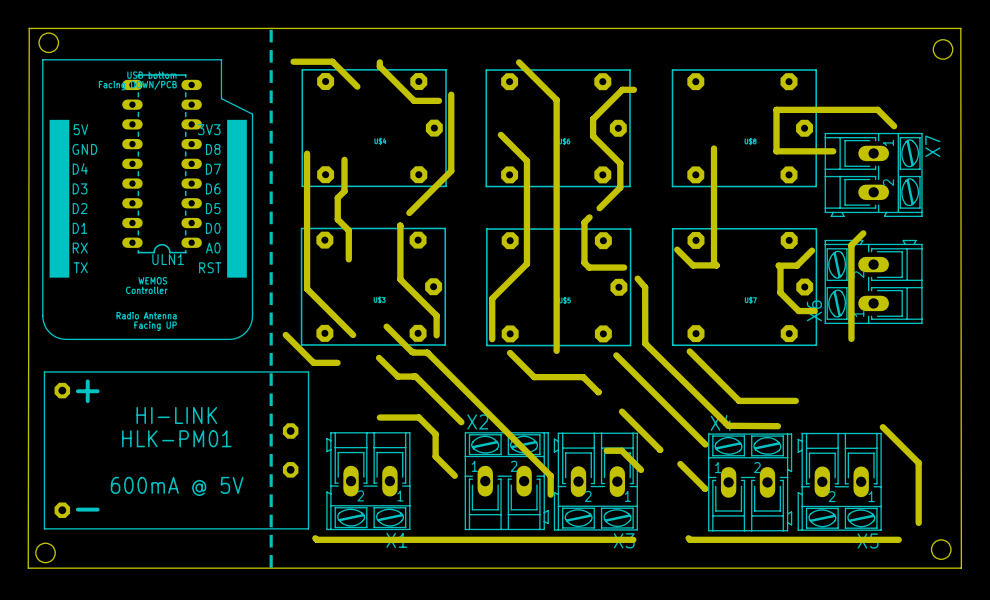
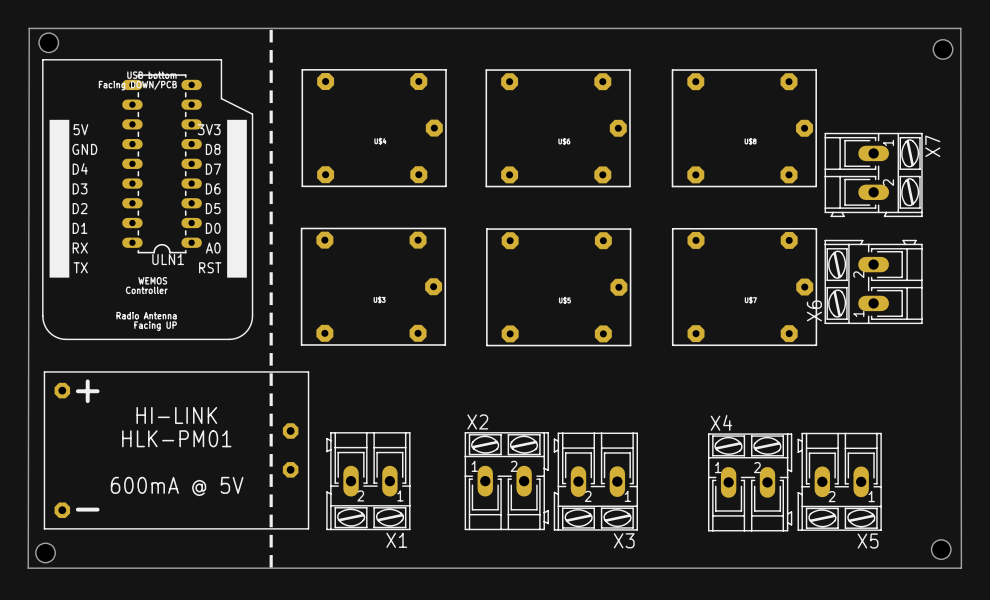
board edge: (293, 61) (332, 61) (357, 86) -> none
board edge: (379, 62) (379, 66) (414, 100) (438, 100) -> none
board edge: (519, 62) (556, 99) (556, 350) -> none
board edge: (633, 89) (622, 89) (593, 119) (593, 136) (620, 163) (620, 187) (599, 208) -> none
board edge: (451, 94) (451, 171) (409, 212) -> none
board edge: (894, 126) (877, 109) (776, 109) (776, 151) (833, 151) -> none
board edge: (500, 134) (526, 161) (526, 263) (492, 298) (492, 339) -> none
board edge: (714, 148) (714, 262) (716, 265) (692, 265) (677, 249) -> none
board edge: (307, 153) (307, 288) (353, 334) -> none
board edge: (344, 159) (344, 191) (337, 197) (337, 219) (348, 230) (348, 259) -> none
board edge: (589, 217) (584, 222) (584, 262) (589, 267) (624, 267) -> none
board edge: (399, 225) (400, 279) (436, 315) (436, 335) -> none
board edge: (863, 233) (851, 245) (851, 338) -> none
board edge: (812, 250) (796, 265) (778, 265) (780, 267) (780, 292) (798, 311) (814, 311) -> none
board edge: (637, 278) (645, 287) (645, 343) (728, 425) (777, 426) -> none
board edge: (386, 326) (413, 352) -> none
board edge: (285, 334) (313, 362) (337, 362) -> none
board edge: (689, 351) (739, 400) (795, 400) -> none
board edge: (413, 352) (428, 353) -> none
board edge: (510, 352) (534, 377) (583, 377) (598, 392) -> none
board edge: (428, 353) (550, 475) (550, 494) -> none
board edge: (616, 355) (705, 444) -> none
board edge: (379, 357) (397, 376) (415, 376) (461, 422) -> none
board edge: (621, 411) (660, 449) -> none
board edge: (379, 417) (418, 417) (435, 434) (435, 456) (454, 475) -> none
board edge: (882, 427) (918, 463) (918, 522) -> none
board edge: (606, 450) (621, 450) (641, 469) -> none
board edge: (680, 464) (705, 488) -> none
board edge: (315, 538) (316, 539) (633, 539) -> none
board edge: (688, 538) (690, 539) (898, 539) -> none

